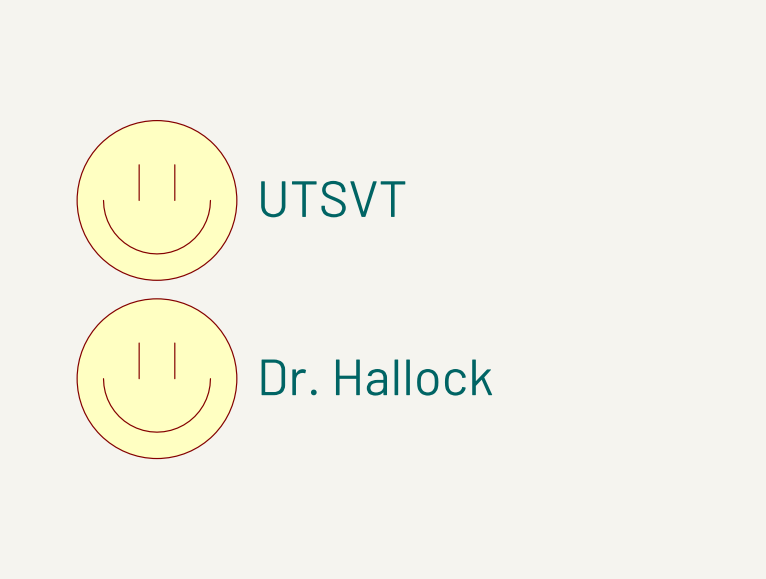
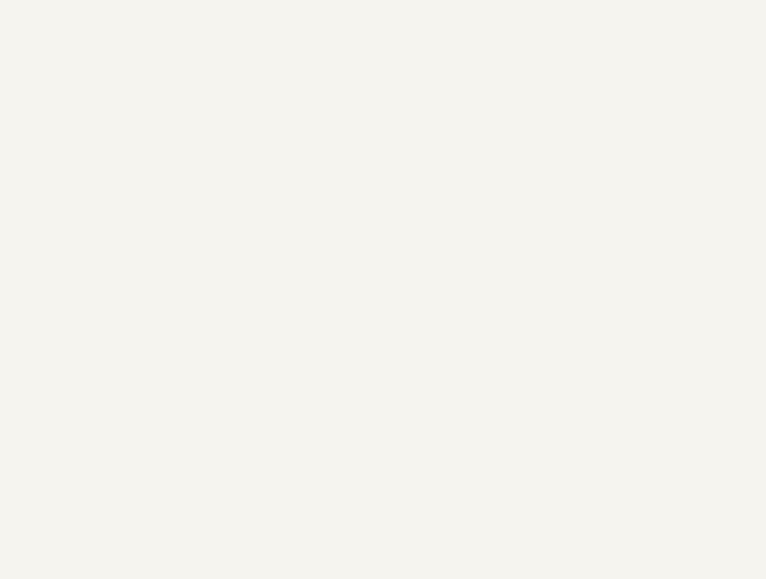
part: UTSVT (156, 200) -> none
part: Dr. Hallock (156, 378) -> none

